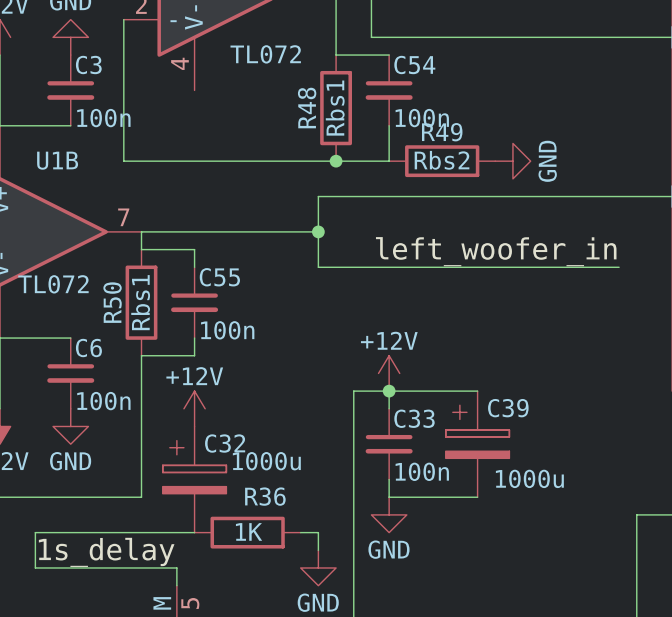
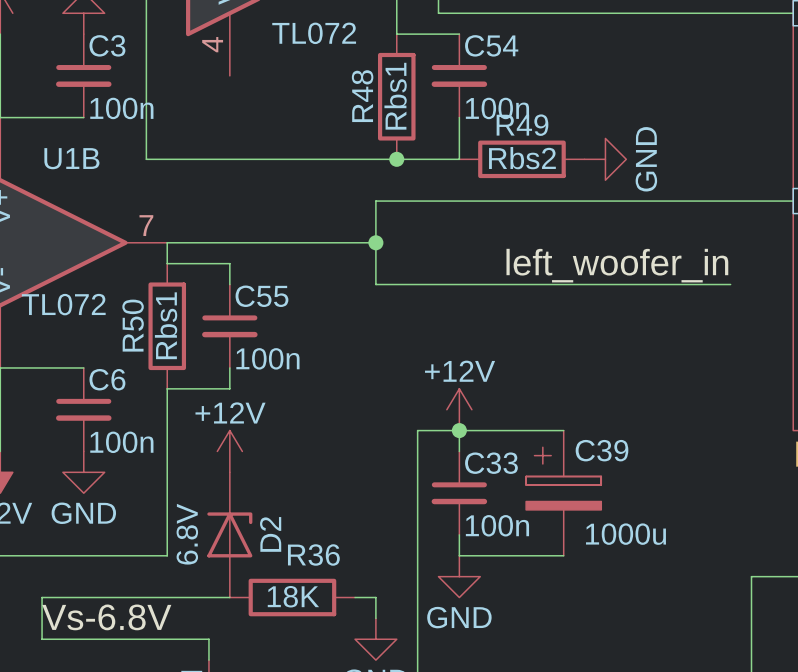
C32: 1000u (194, 479) -> none
D2: none -> 6.8V (229, 534)
R36 value: 1K (249, 531) -> 18K (293, 596)
label: 1s_delay (106, 552) -> Vs-6.8V (106, 617)

